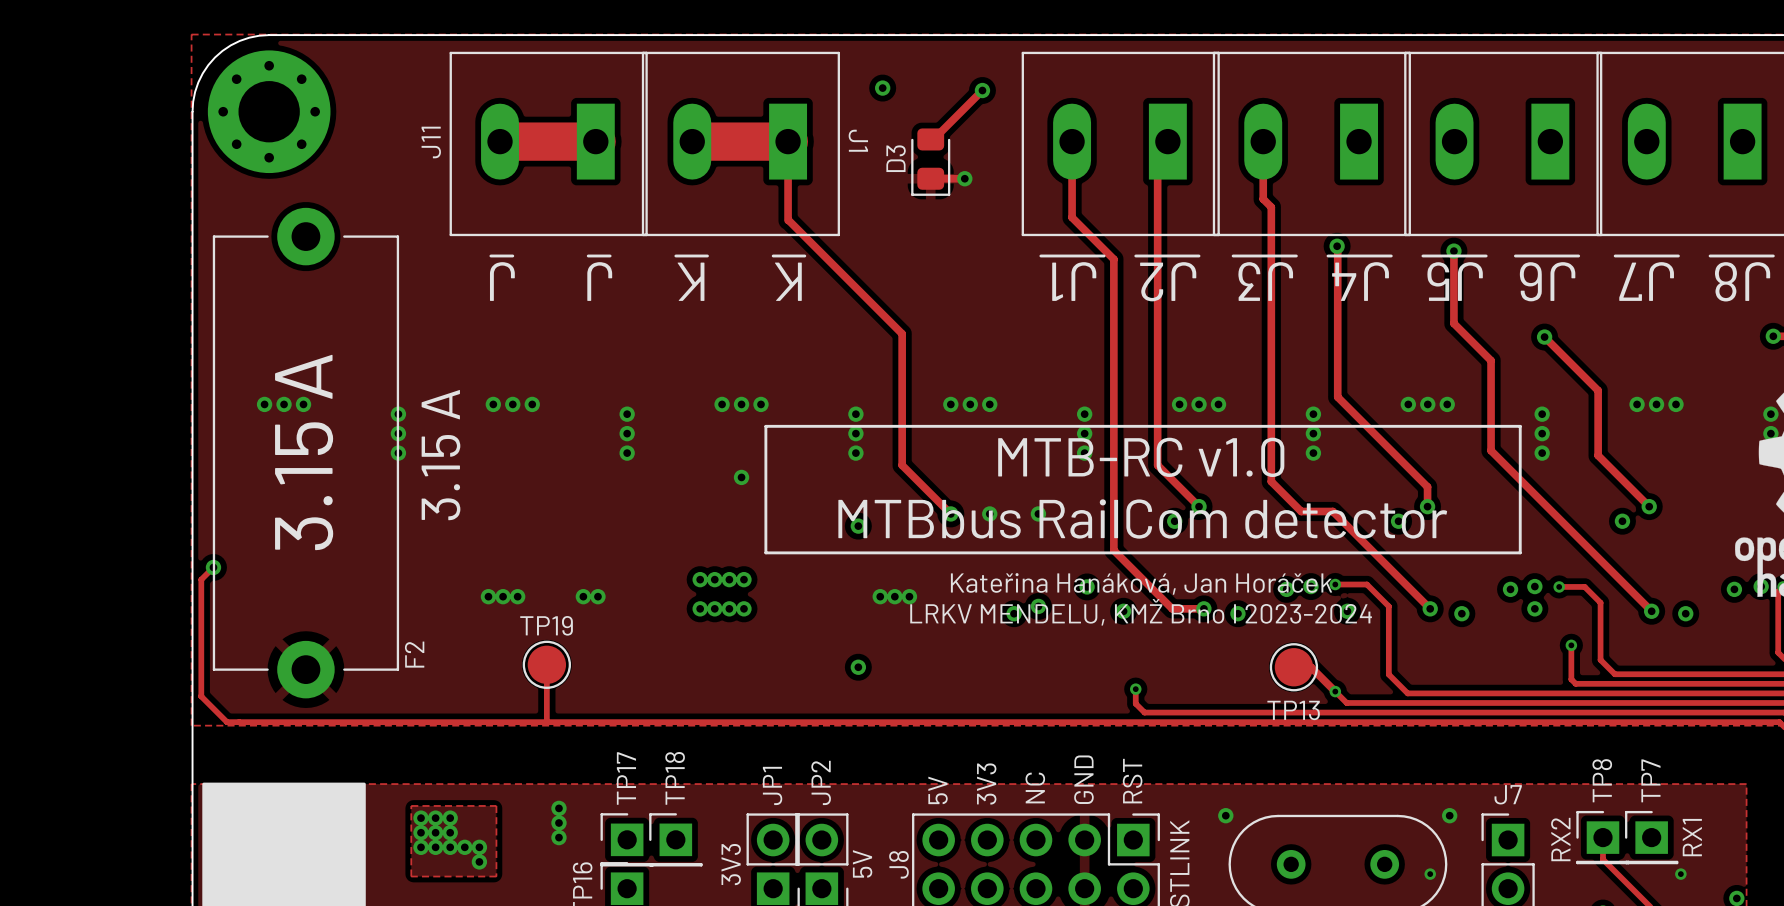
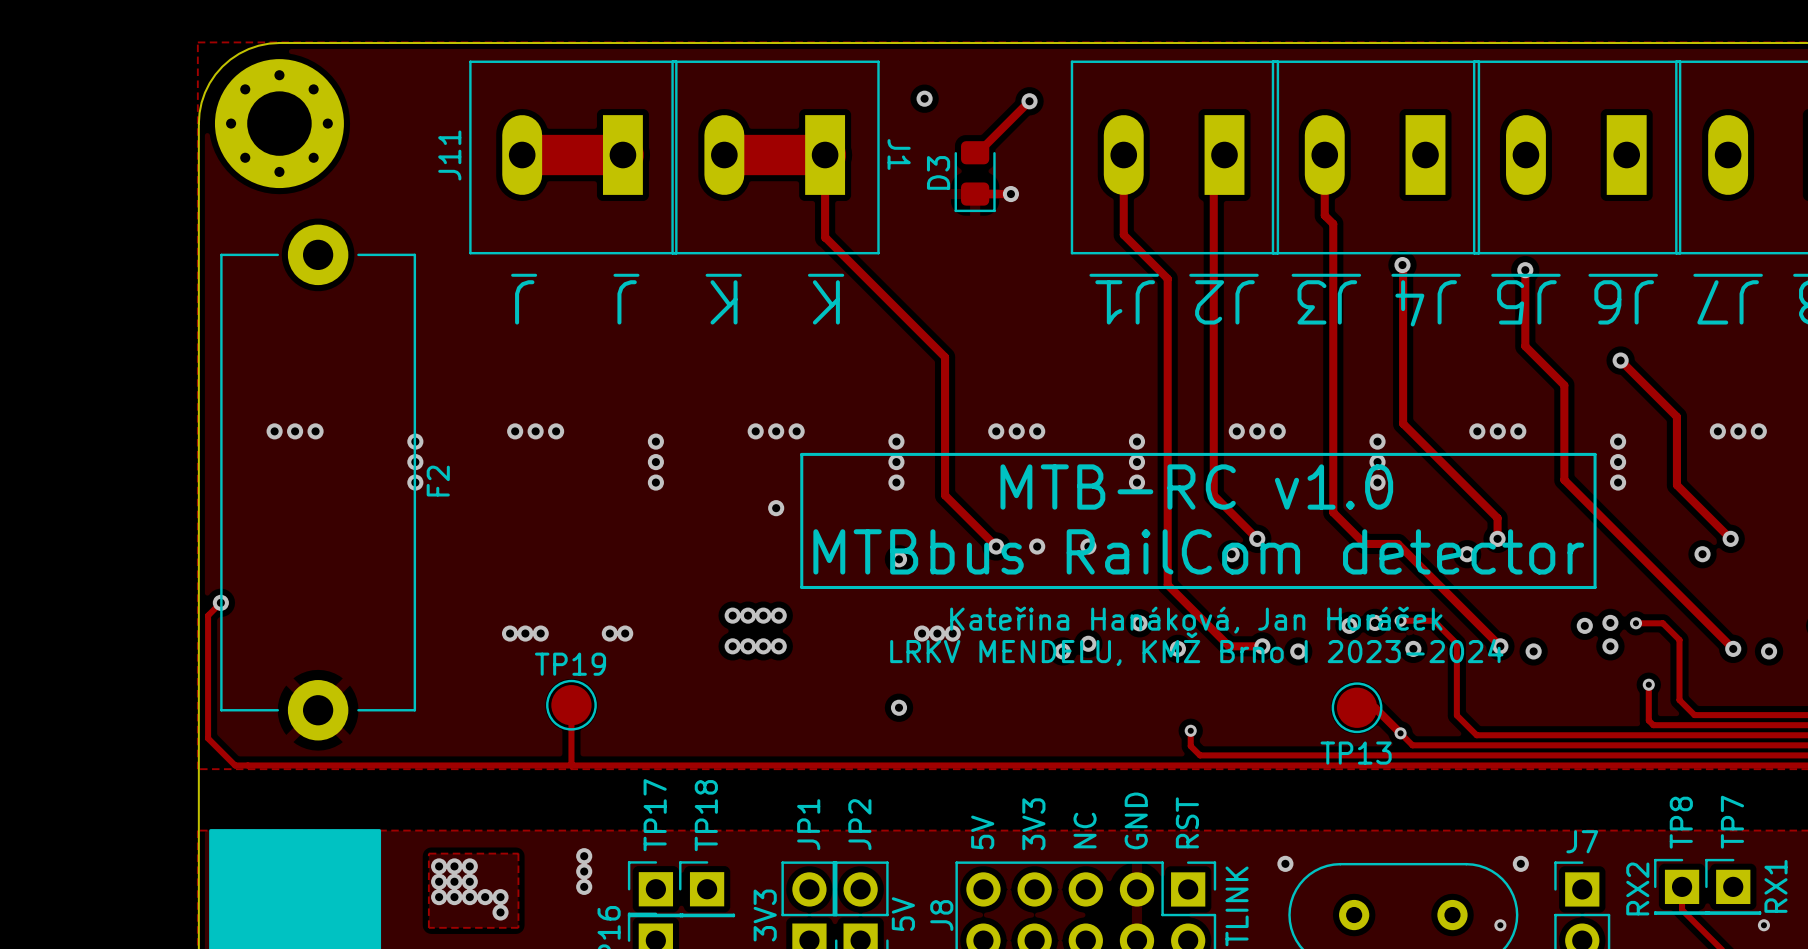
text: 3.15 A (304, 452) -> none
text: 3.15 A (441, 455) -> none
F2 name position: F2 (414, 654) -> F2 (438, 481)

